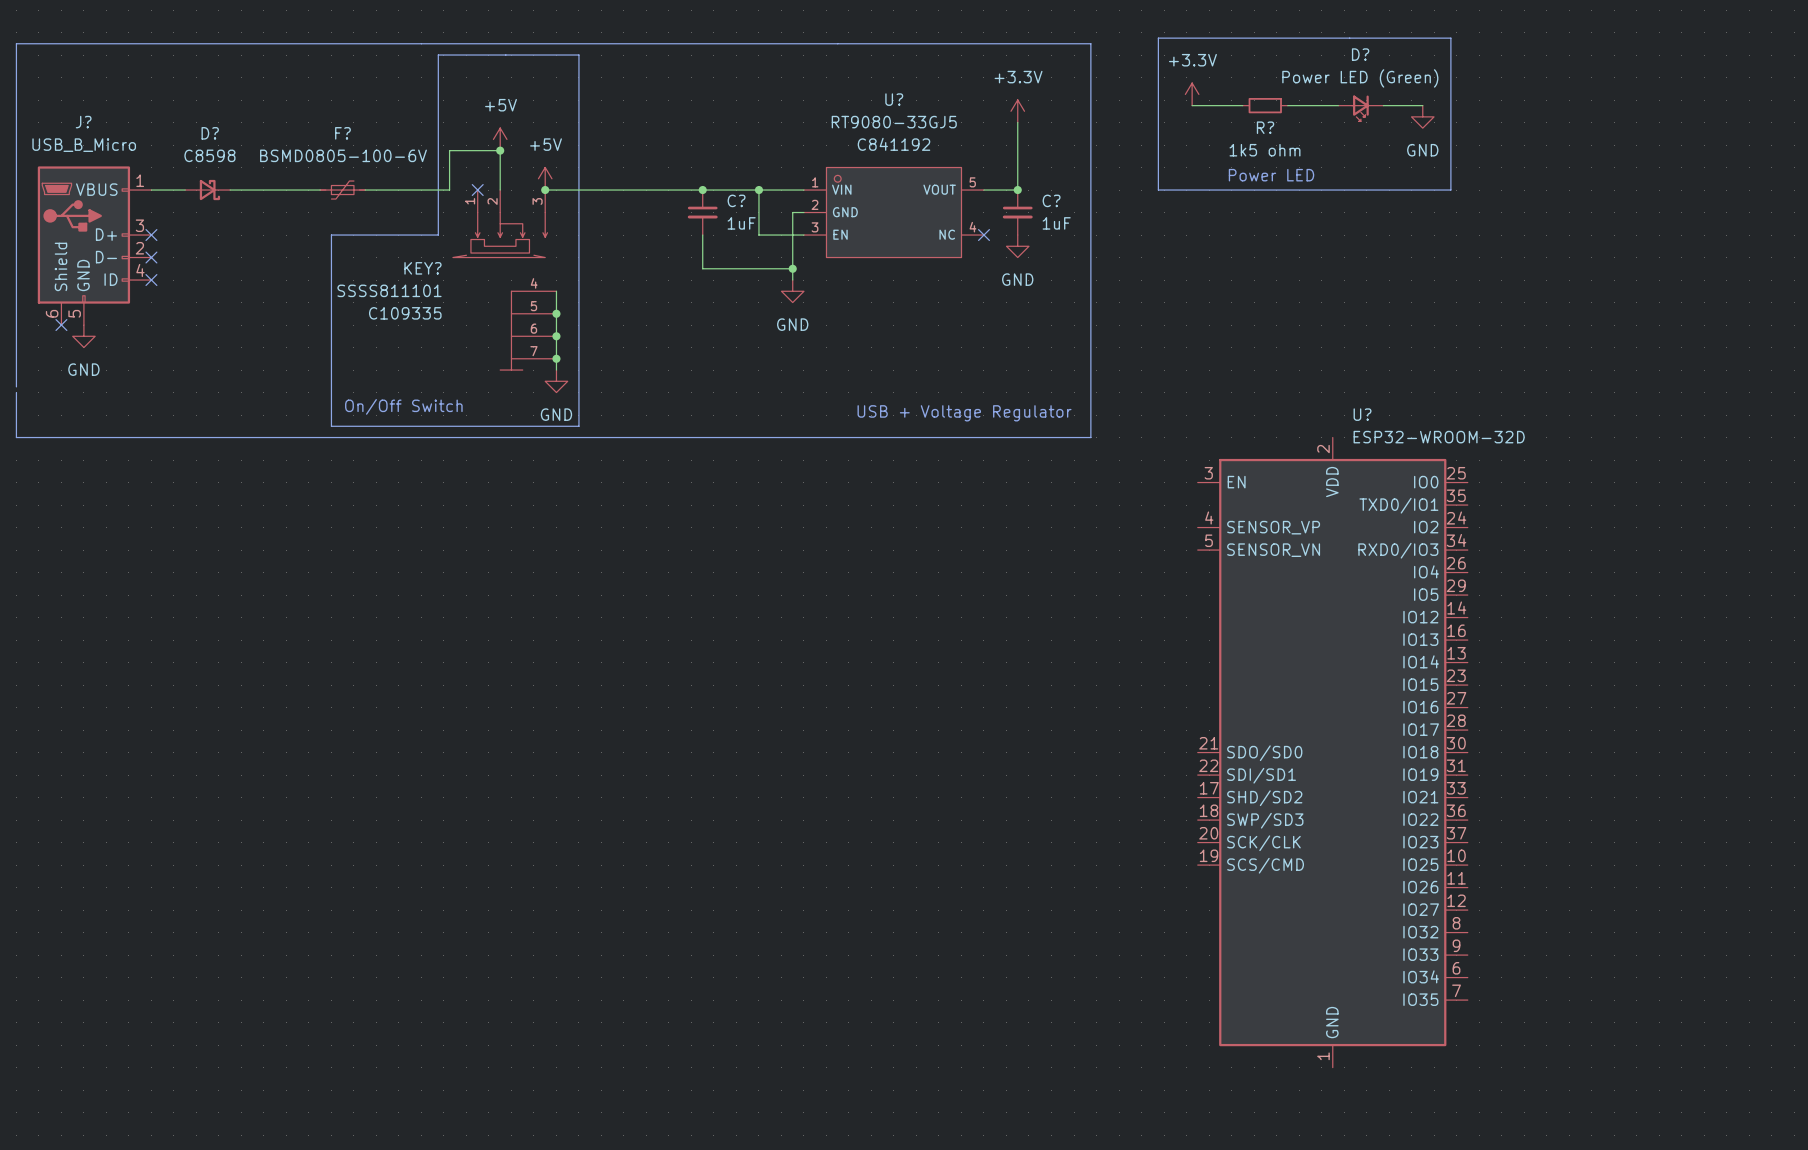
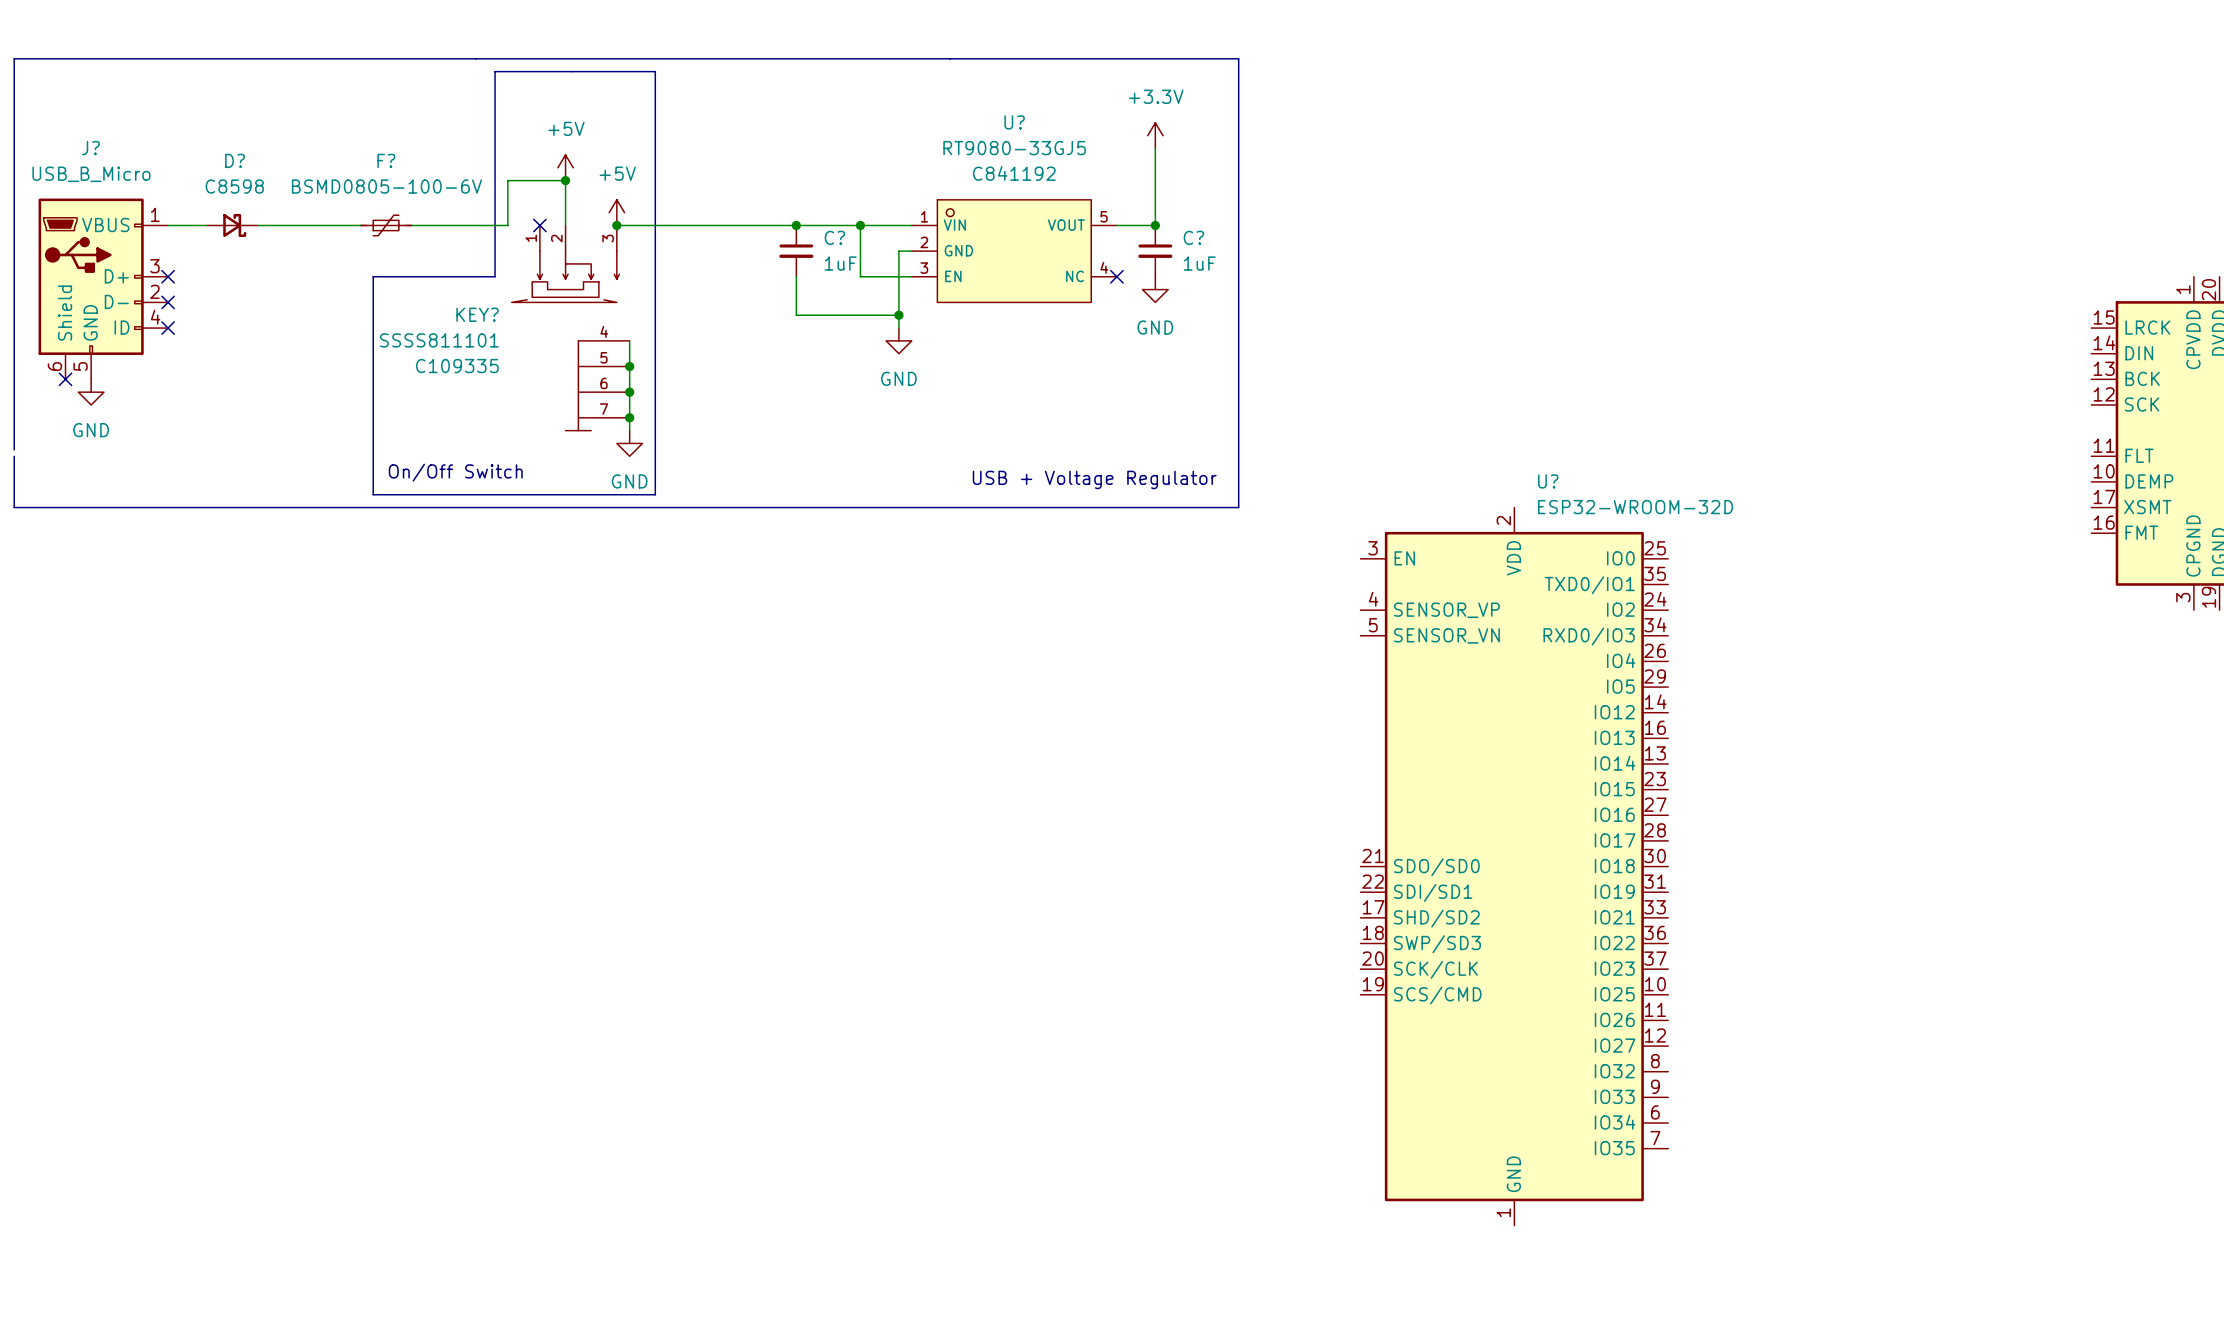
line: (1158, 38) (1158, 190) (1450, 190) (1450, 38) (1158, 38) -> none
power symbol: +3.3V (1192, 94) -> none
wire: (1192, 105) (1242, 105) -> none
R?: 1k5 ohm (1265, 105) -> none
wire: (1287, 105) (1338, 105) -> none
wire: (1383, 105) (1422, 105) -> none
D?: Power LED (Green) (1360, 108) -> none
power symbol: GND (1422, 116) -> none
text: Power LED (1271, 175) -> none

